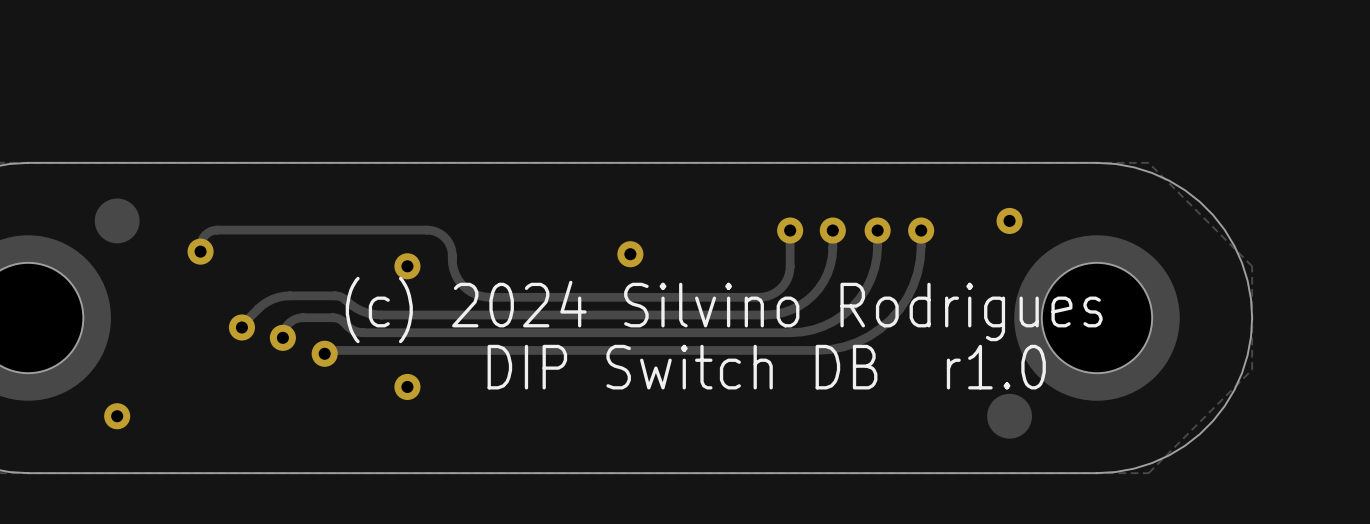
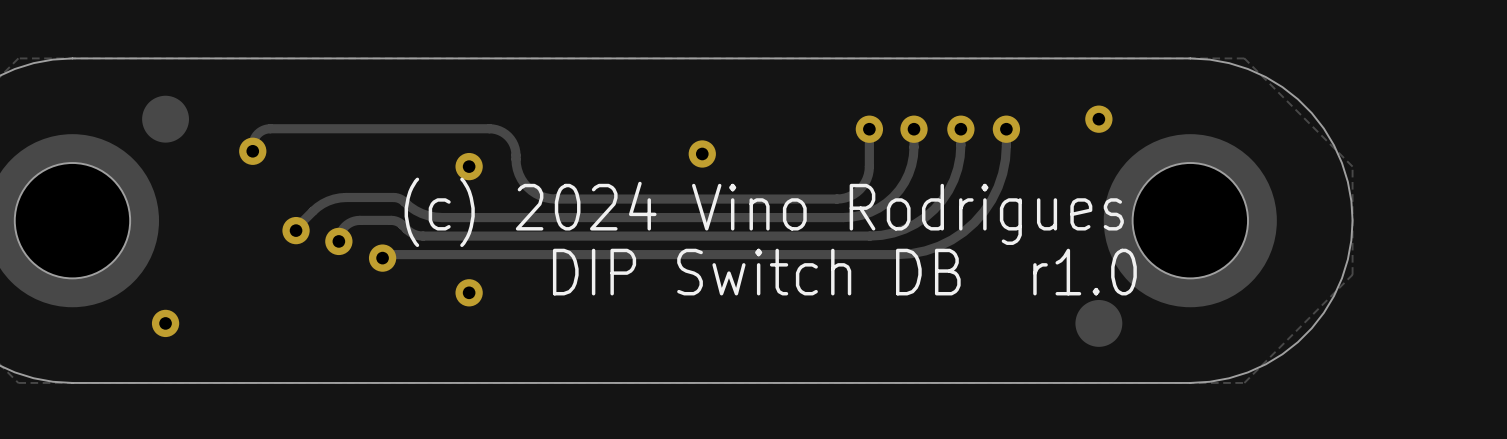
text: (c) 2024 Silvino Rodrigues (724, 310) -> (c) 2024 Vino Rodrigues (764, 212)

